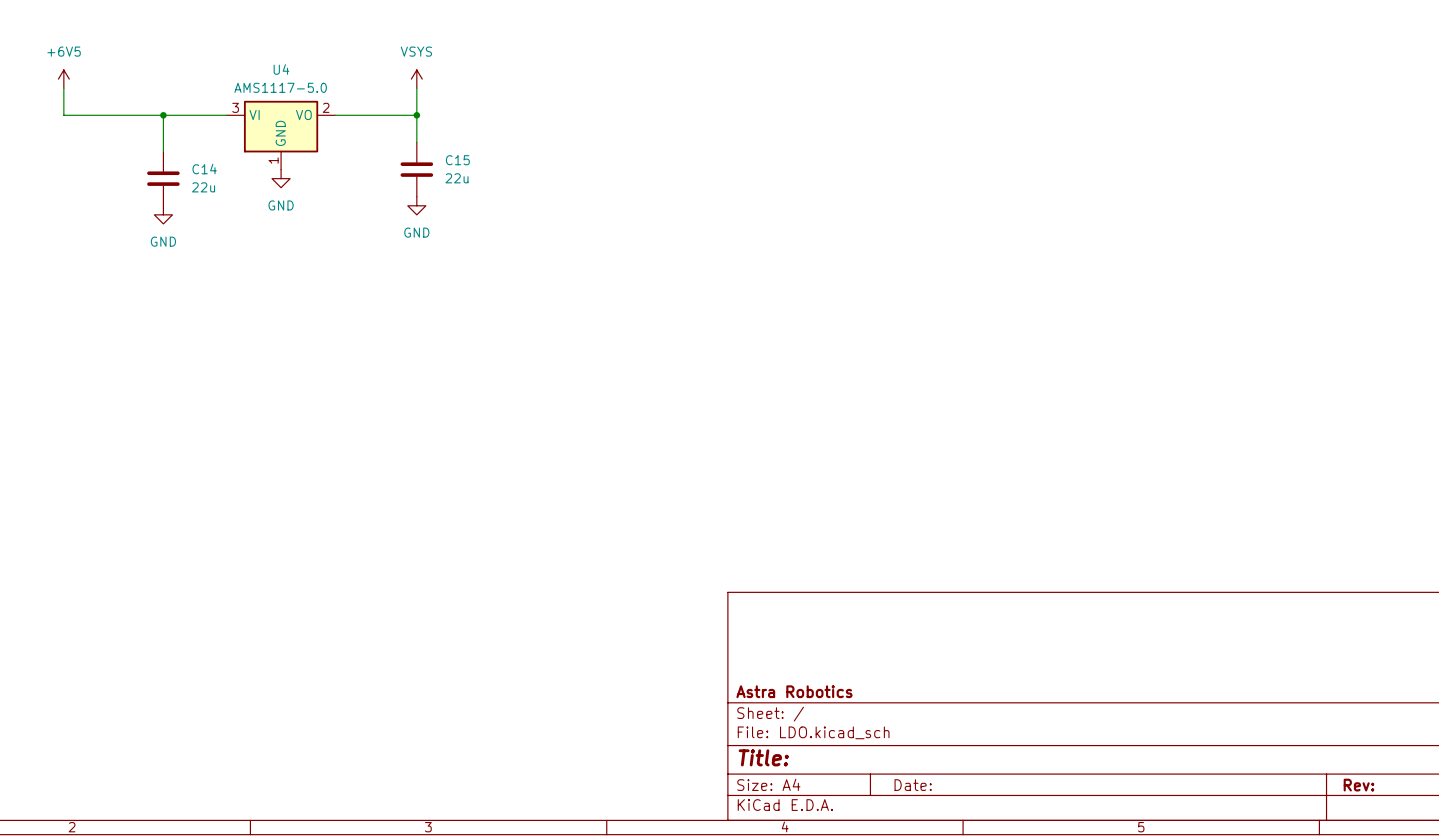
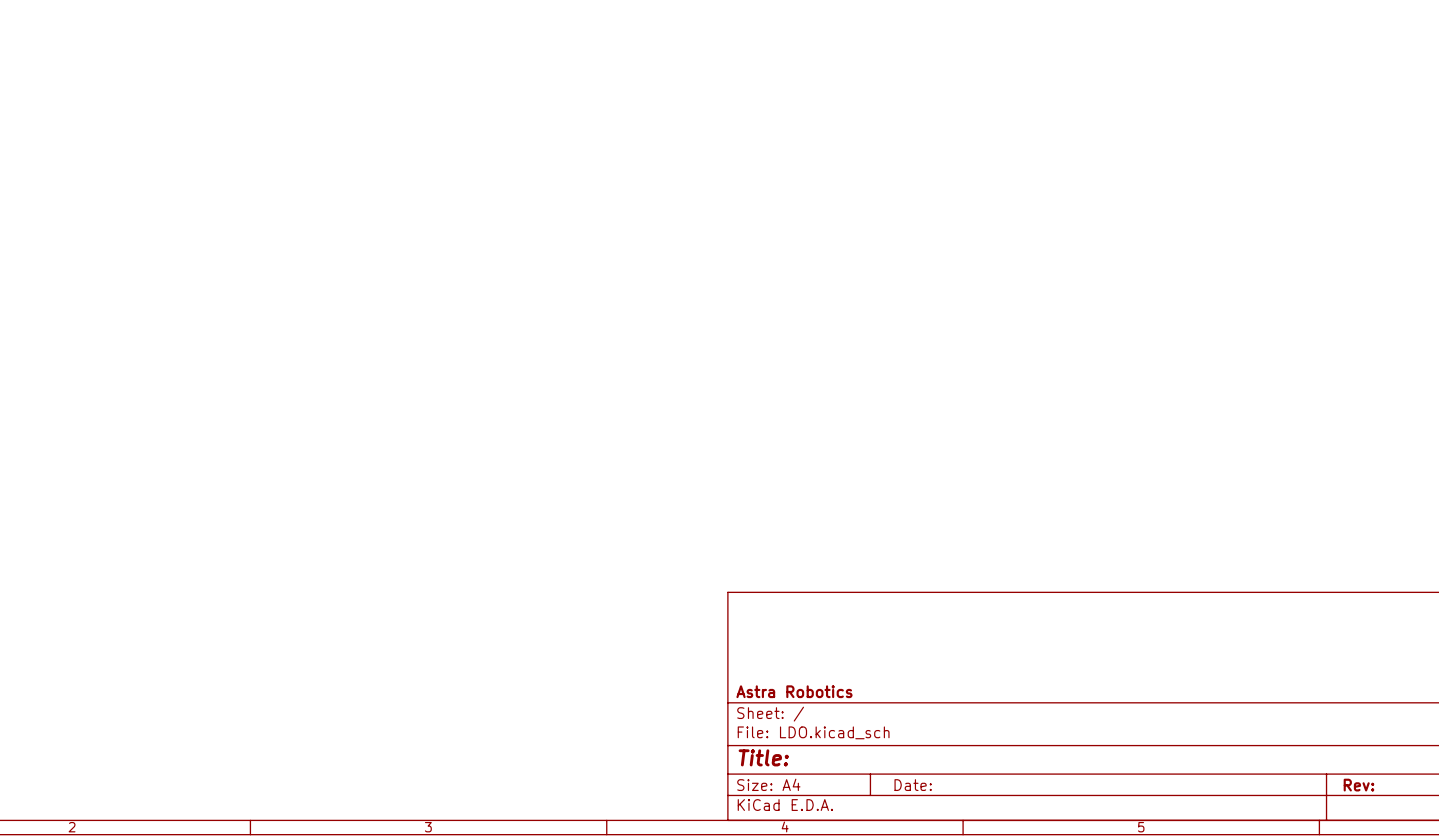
power symbol: +6V5 (63, 79) -> none
power symbol: VSYS (416, 79) -> none
wire: (63, 88) (63, 115) (226, 115) -> none
wire: (416, 88) (416, 142) -> none
wire: (163, 115) (163, 151) -> none
junction: (163, 115) -> none
wire: (335, 115) (416, 115) -> none
junction: (416, 115) -> none
U4: AMS1117-5.0 (281, 135) -> none
C15: 22u (416, 169) -> none
C14: 22u (163, 178) -> none
power symbol: GND (281, 178) -> none
power symbol: GND (416, 205) -> none
power symbol: GND (163, 214) -> none

